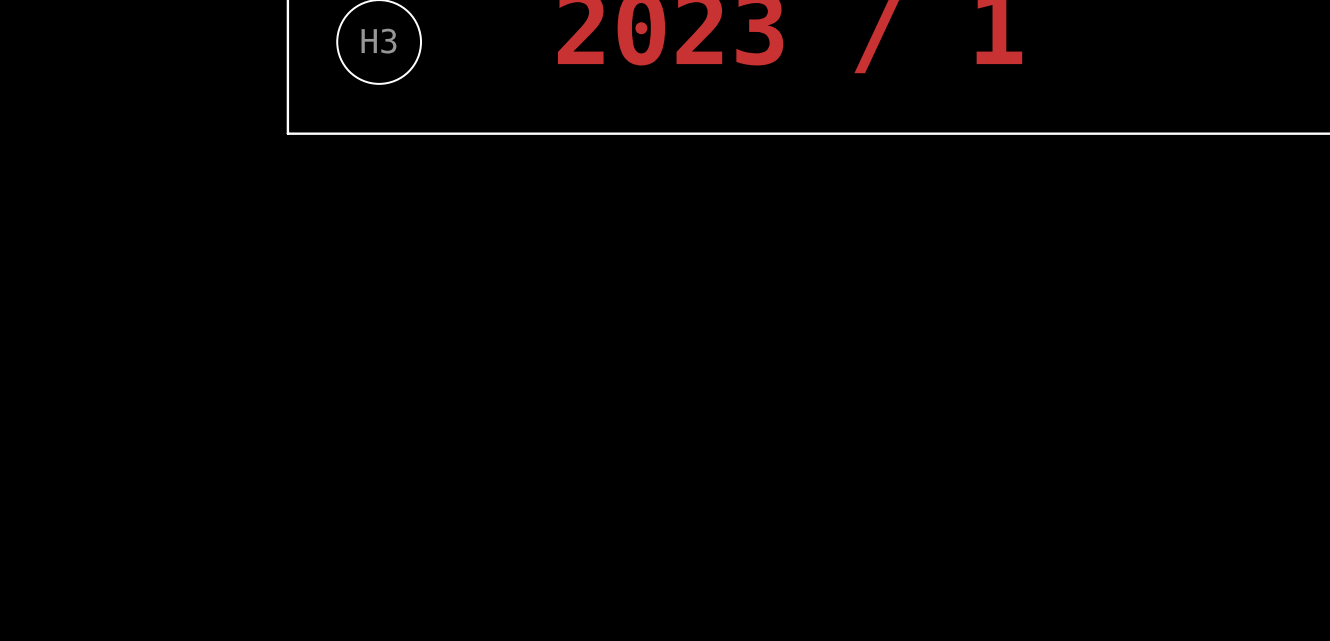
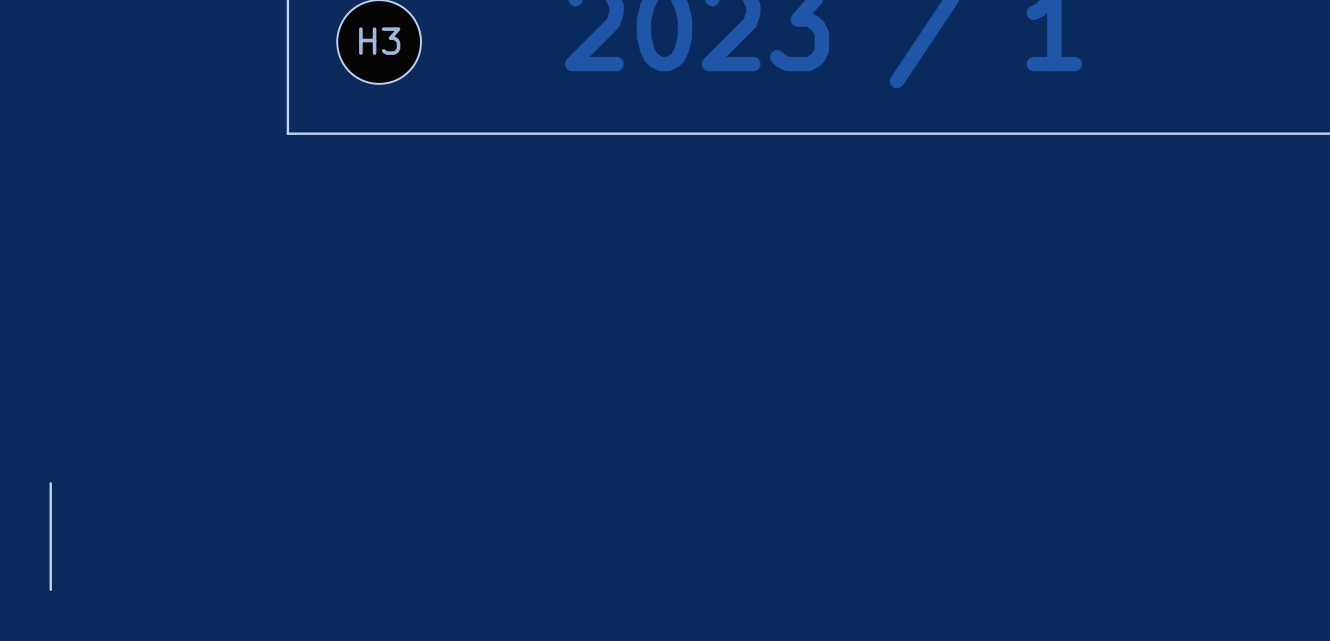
board edge: none -> (50, 483) (50, 589)

